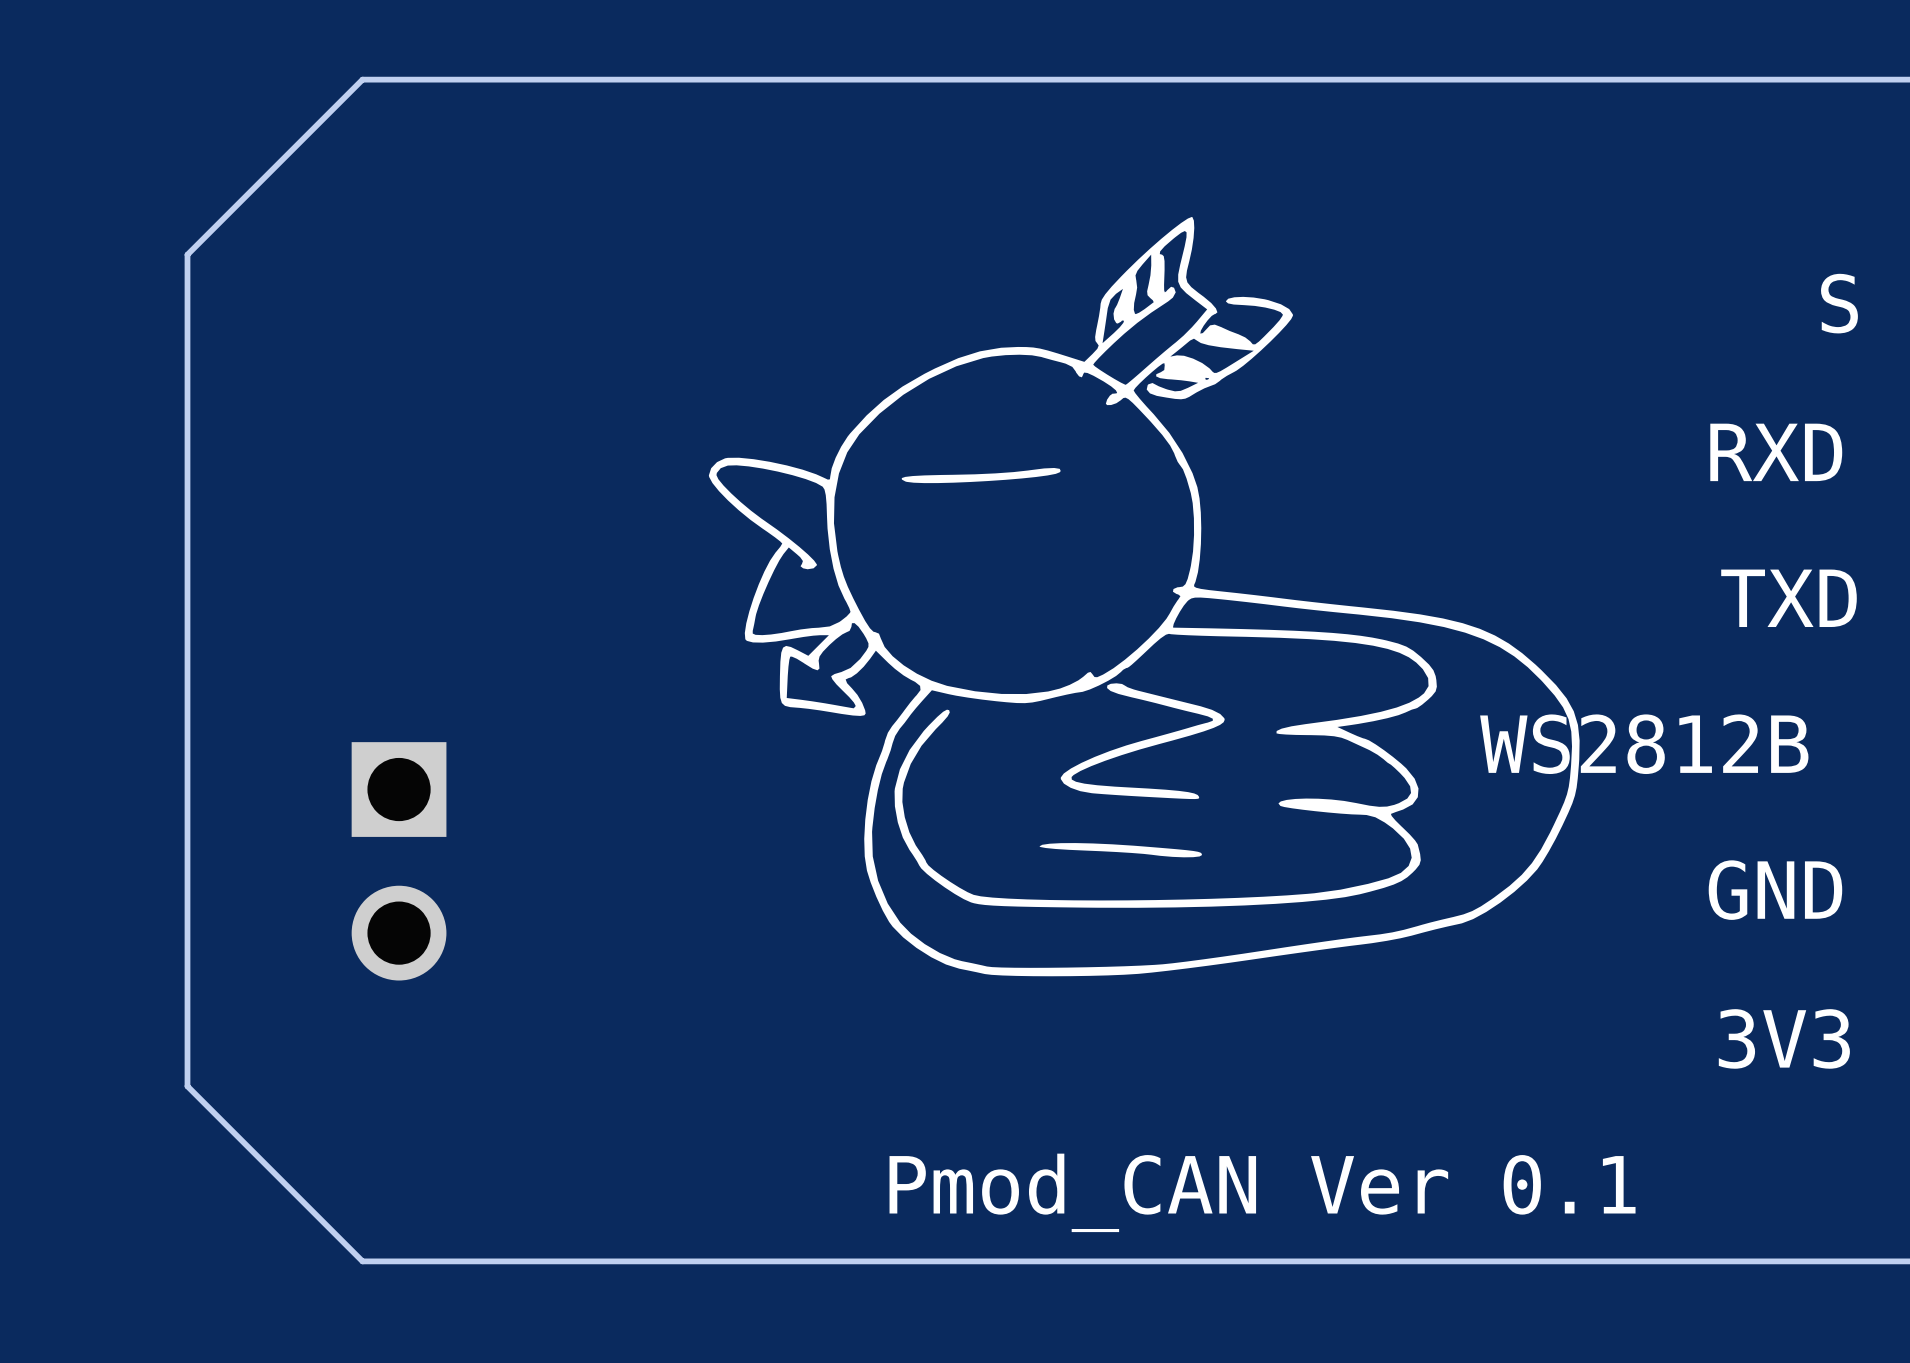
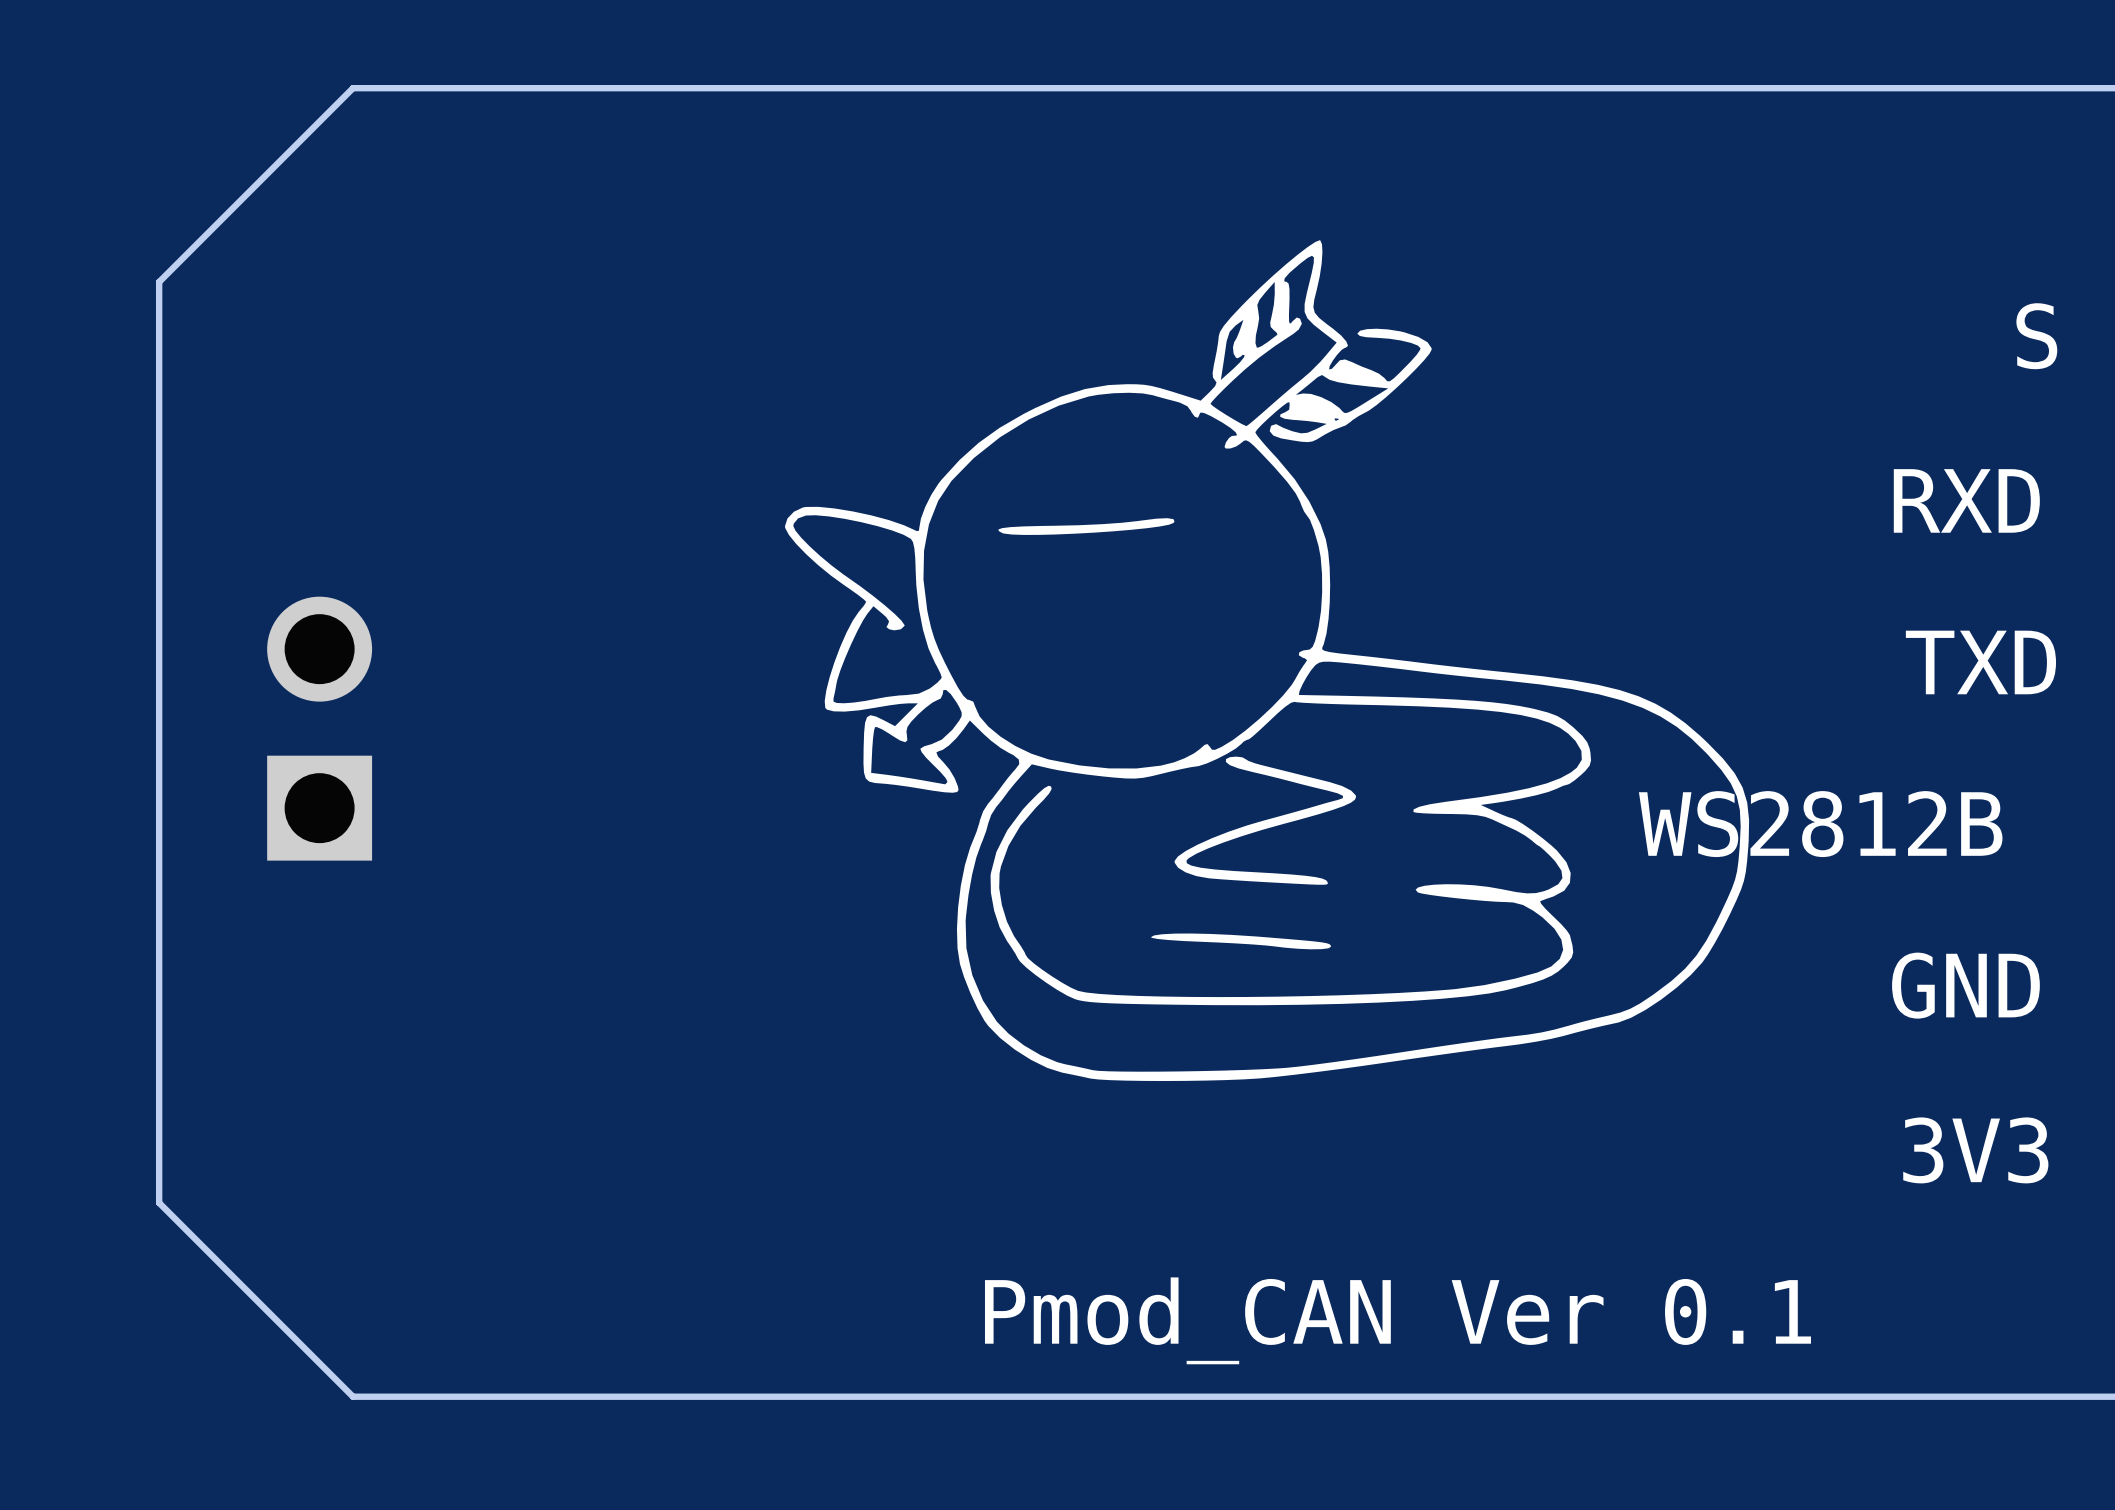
board edge: (362, 79) (187, 254) (187, 1086) (362, 1261) -> (401, 88) (353, 88) (159, 282) (159, 1202) (353, 1396) (401, 1396)
part rotation: 0° (399, 861) -> 180° (319, 728)
part position: (399, 861) -> (319, 728)

